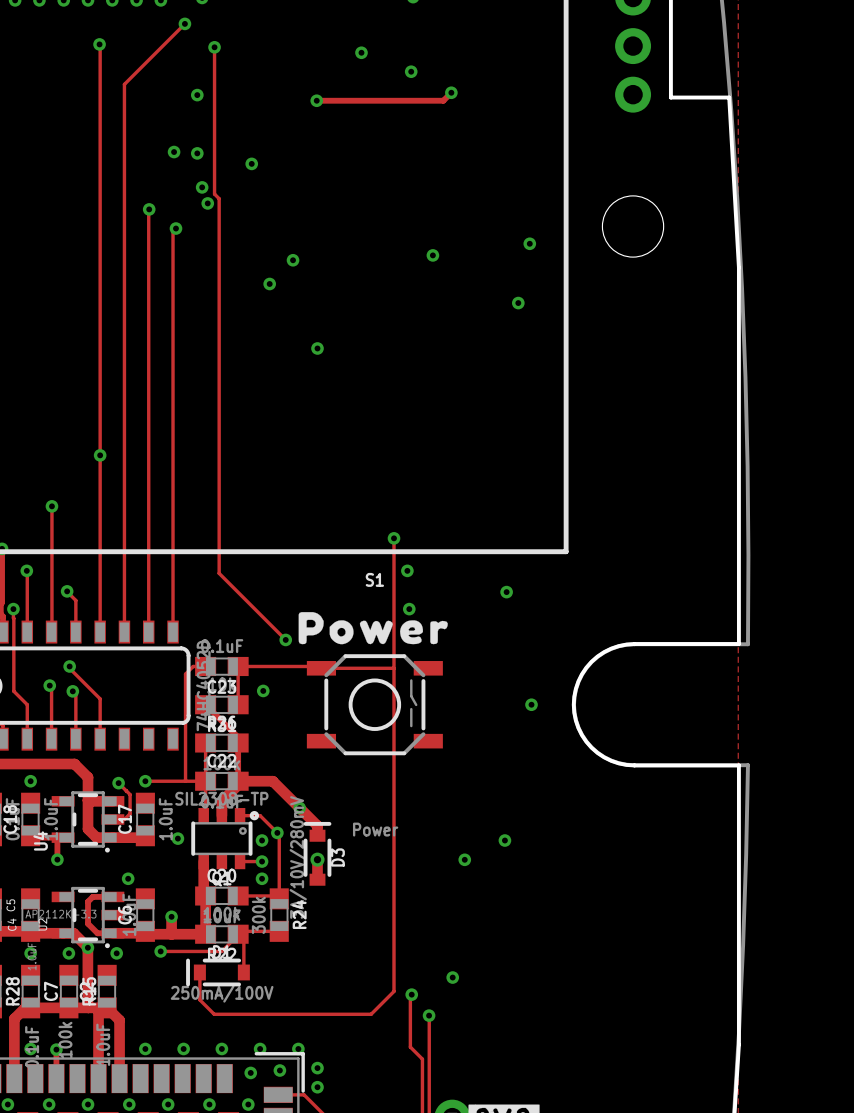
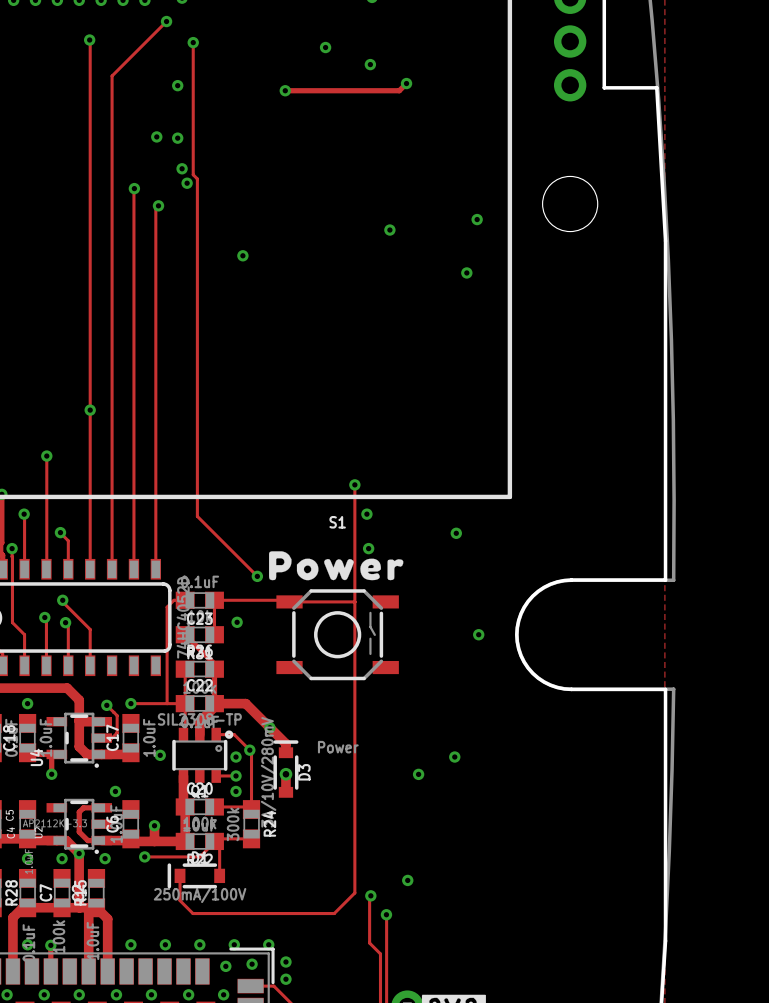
via: (251, 163) -> none
via: (293, 260) -> none
via: (317, 348) -> none

